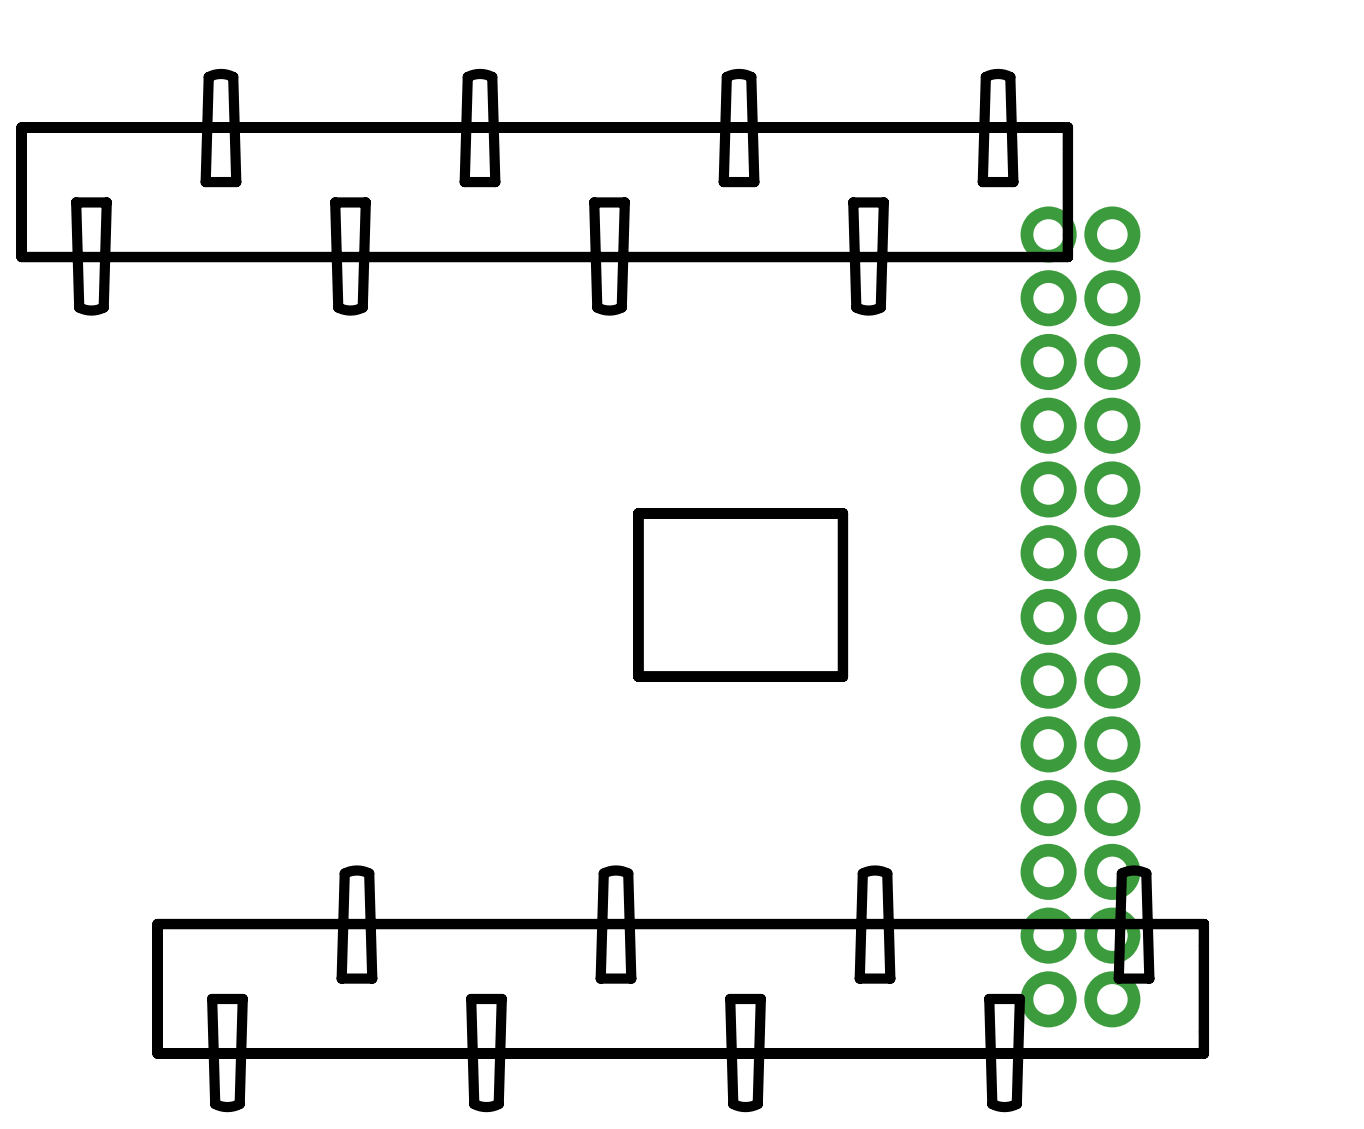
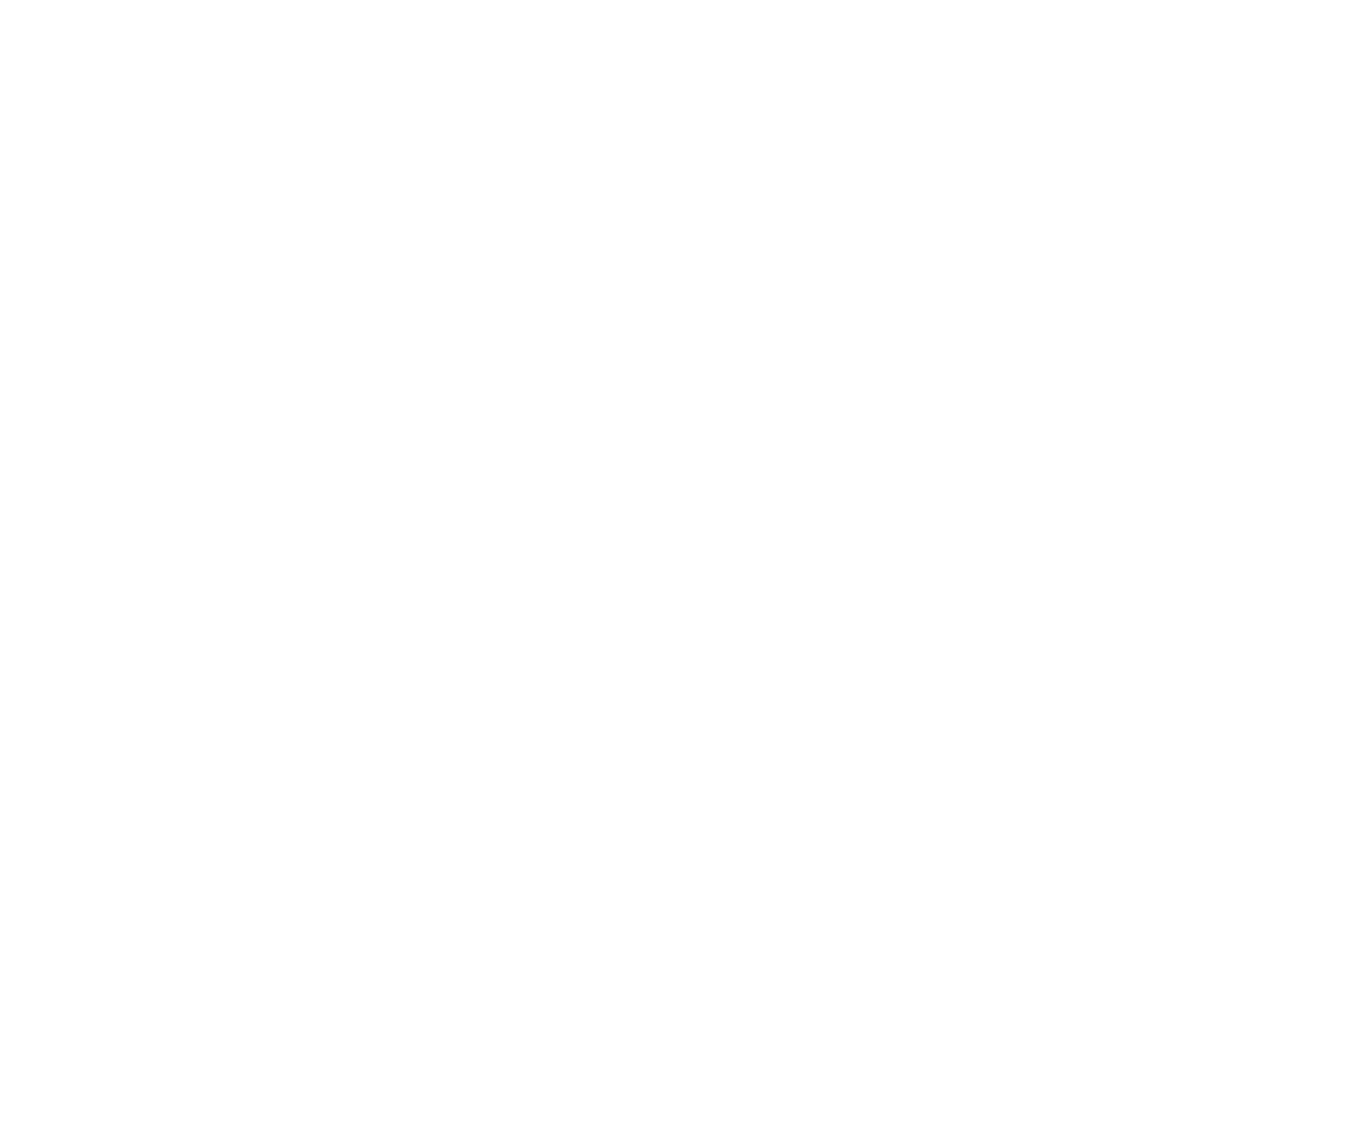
board edge: (233, 77) (236, 182) (205, 182) (208, 77) (220, 73) (233, 77) -> none
board edge: (492, 77) (495, 182) (464, 182) (467, 77) (480, 73) (492, 77) -> none
board edge: (751, 77) (754, 182) (723, 182) (726, 77) (739, 73) (751, 77) -> none
board edge: (1010, 77) (1013, 182) (982, 182) (985, 77) (998, 73) (1010, 77) -> none
board edge: (1067, 127) (1067, 257) (21, 257) (21, 127) (1067, 127) -> none
board edge: (106, 202) (76, 202) (79, 307) (85, 309) (94, 310) (103, 307) (106, 202) -> none
board edge: (365, 202) (335, 202) (338, 307) (344, 309) (353, 310) (362, 307) (365, 202) -> none
board edge: (624, 202) (594, 202) (597, 307) (603, 309) (612, 310) (621, 307) (624, 202) -> none
board edge: (883, 202) (853, 202) (856, 307) (862, 309) (871, 310) (880, 307) (883, 202) -> none
board edge: (842, 513) (842, 676) (638, 676) (638, 513) (842, 513) -> none
part: (1080, 616) -> none
board edge: (369, 873) (372, 978) (341, 978) (344, 873) (356, 870) (369, 873) -> none
board edge: (628, 873) (631, 978) (600, 978) (603, 873) (616, 870) (628, 873) -> none
board edge: (887, 873) (890, 978) (859, 978) (862, 873) (875, 870) (887, 873) -> none
board edge: (1146, 873) (1149, 978) (1118, 978) (1121, 873) (1134, 870) (1146, 873) -> none
board edge: (1203, 924) (157, 924) (157, 1053) (1203, 1053) (1203, 924) -> none
board edge: (242, 998) (212, 998) (215, 1104) (221, 1106) (230, 1106) (239, 1104) (242, 998) -> none
board edge: (501, 998) (471, 998) (474, 1104) (480, 1106) (489, 1106) (498, 1104) (501, 998) -> none
board edge: (760, 998) (730, 998) (733, 1104) (739, 1106) (748, 1106) (757, 1104) (760, 998) -> none
board edge: (1019, 998) (989, 998) (992, 1104) (998, 1106) (1007, 1106) (1016, 1104) (1019, 998) -> none

